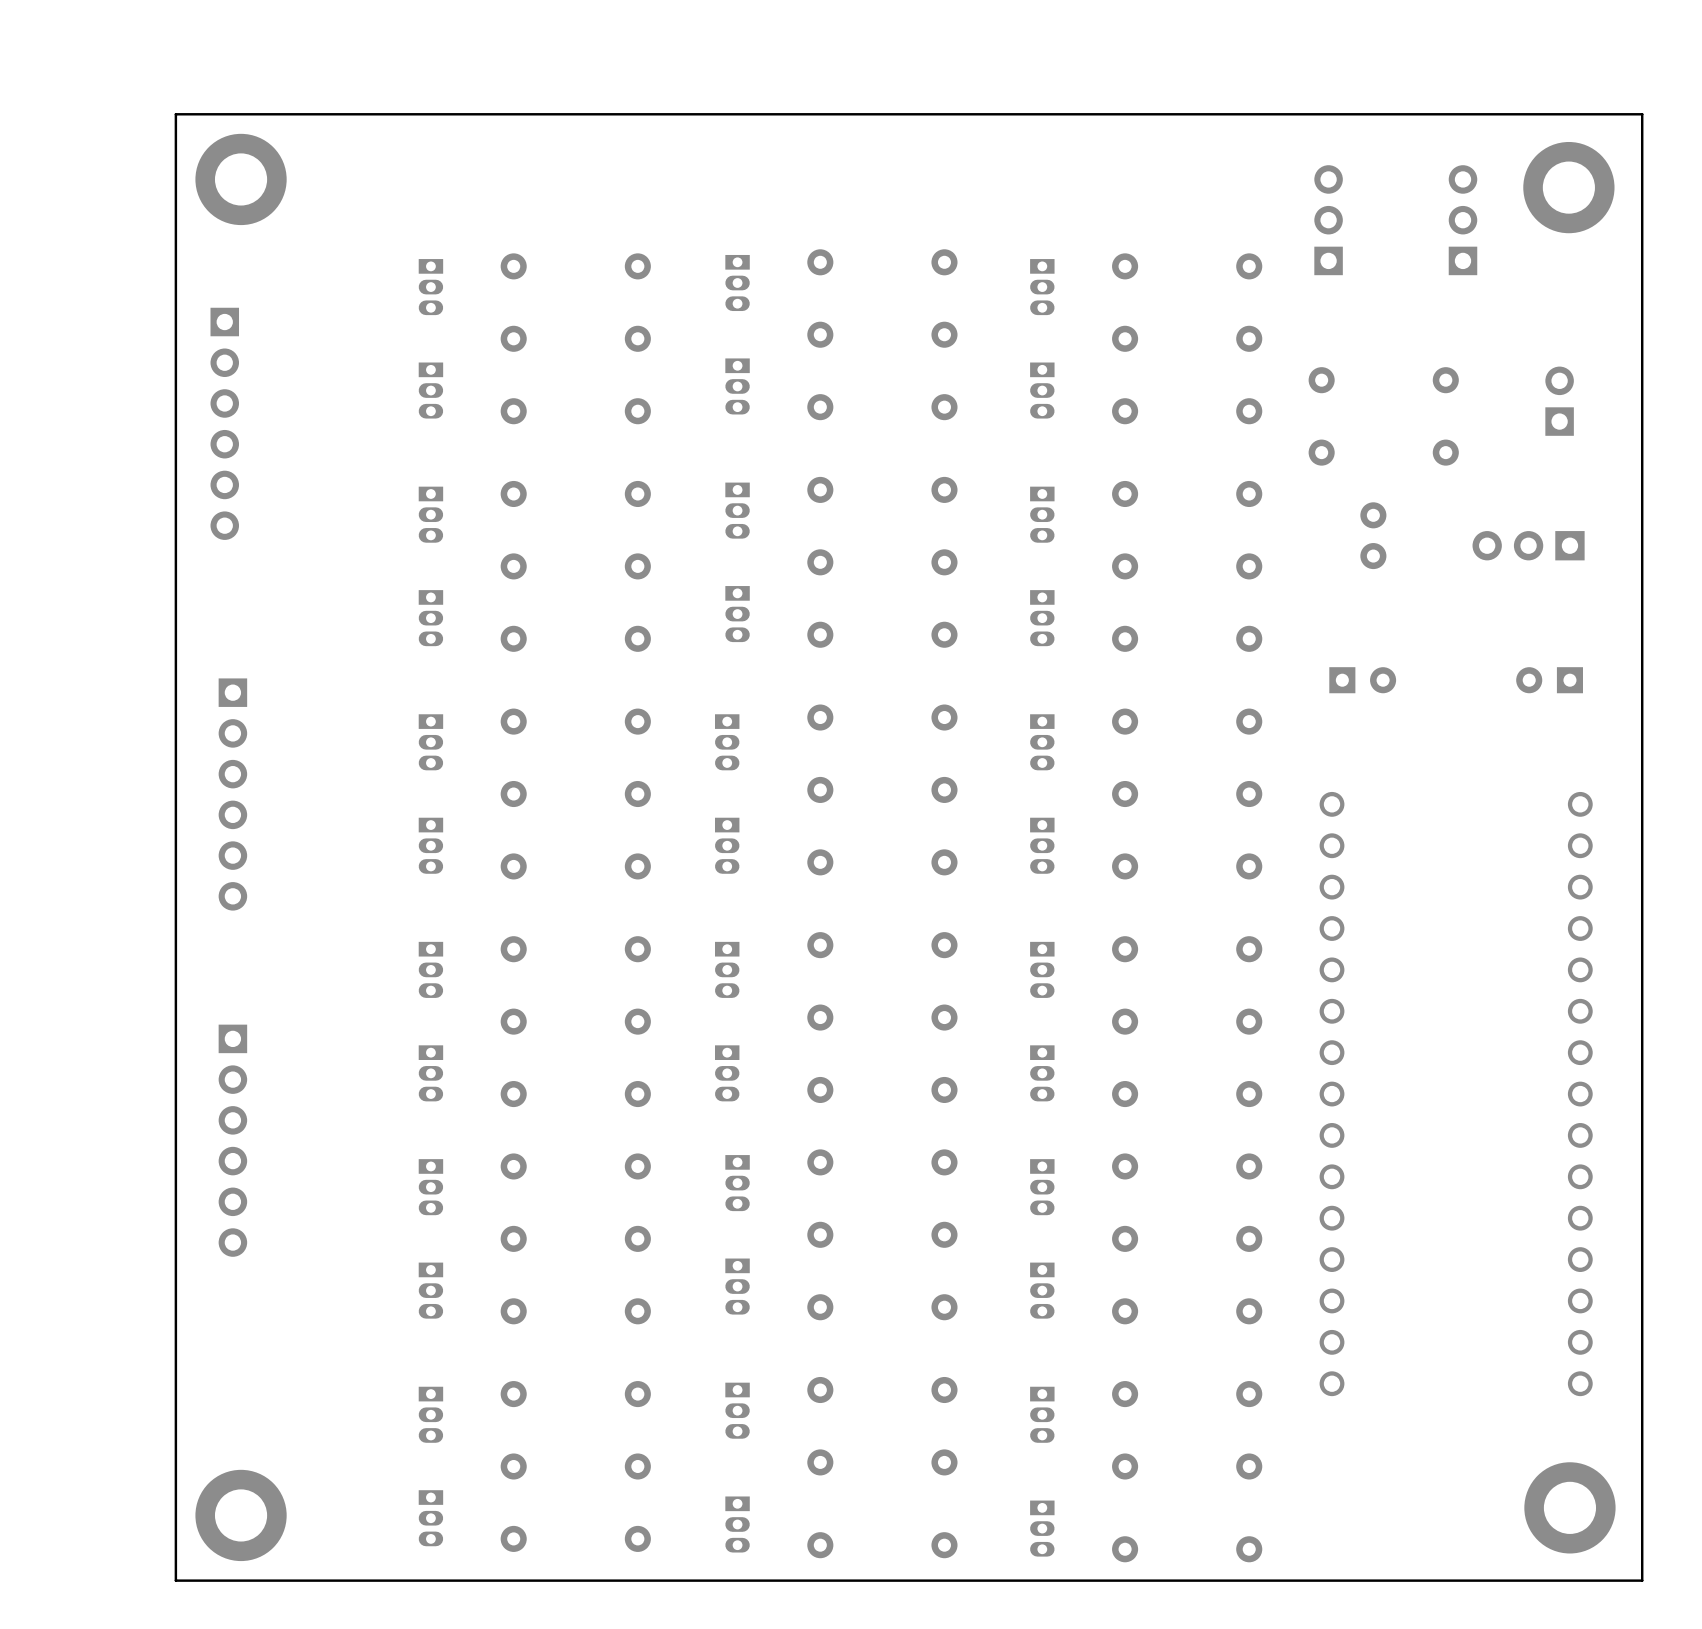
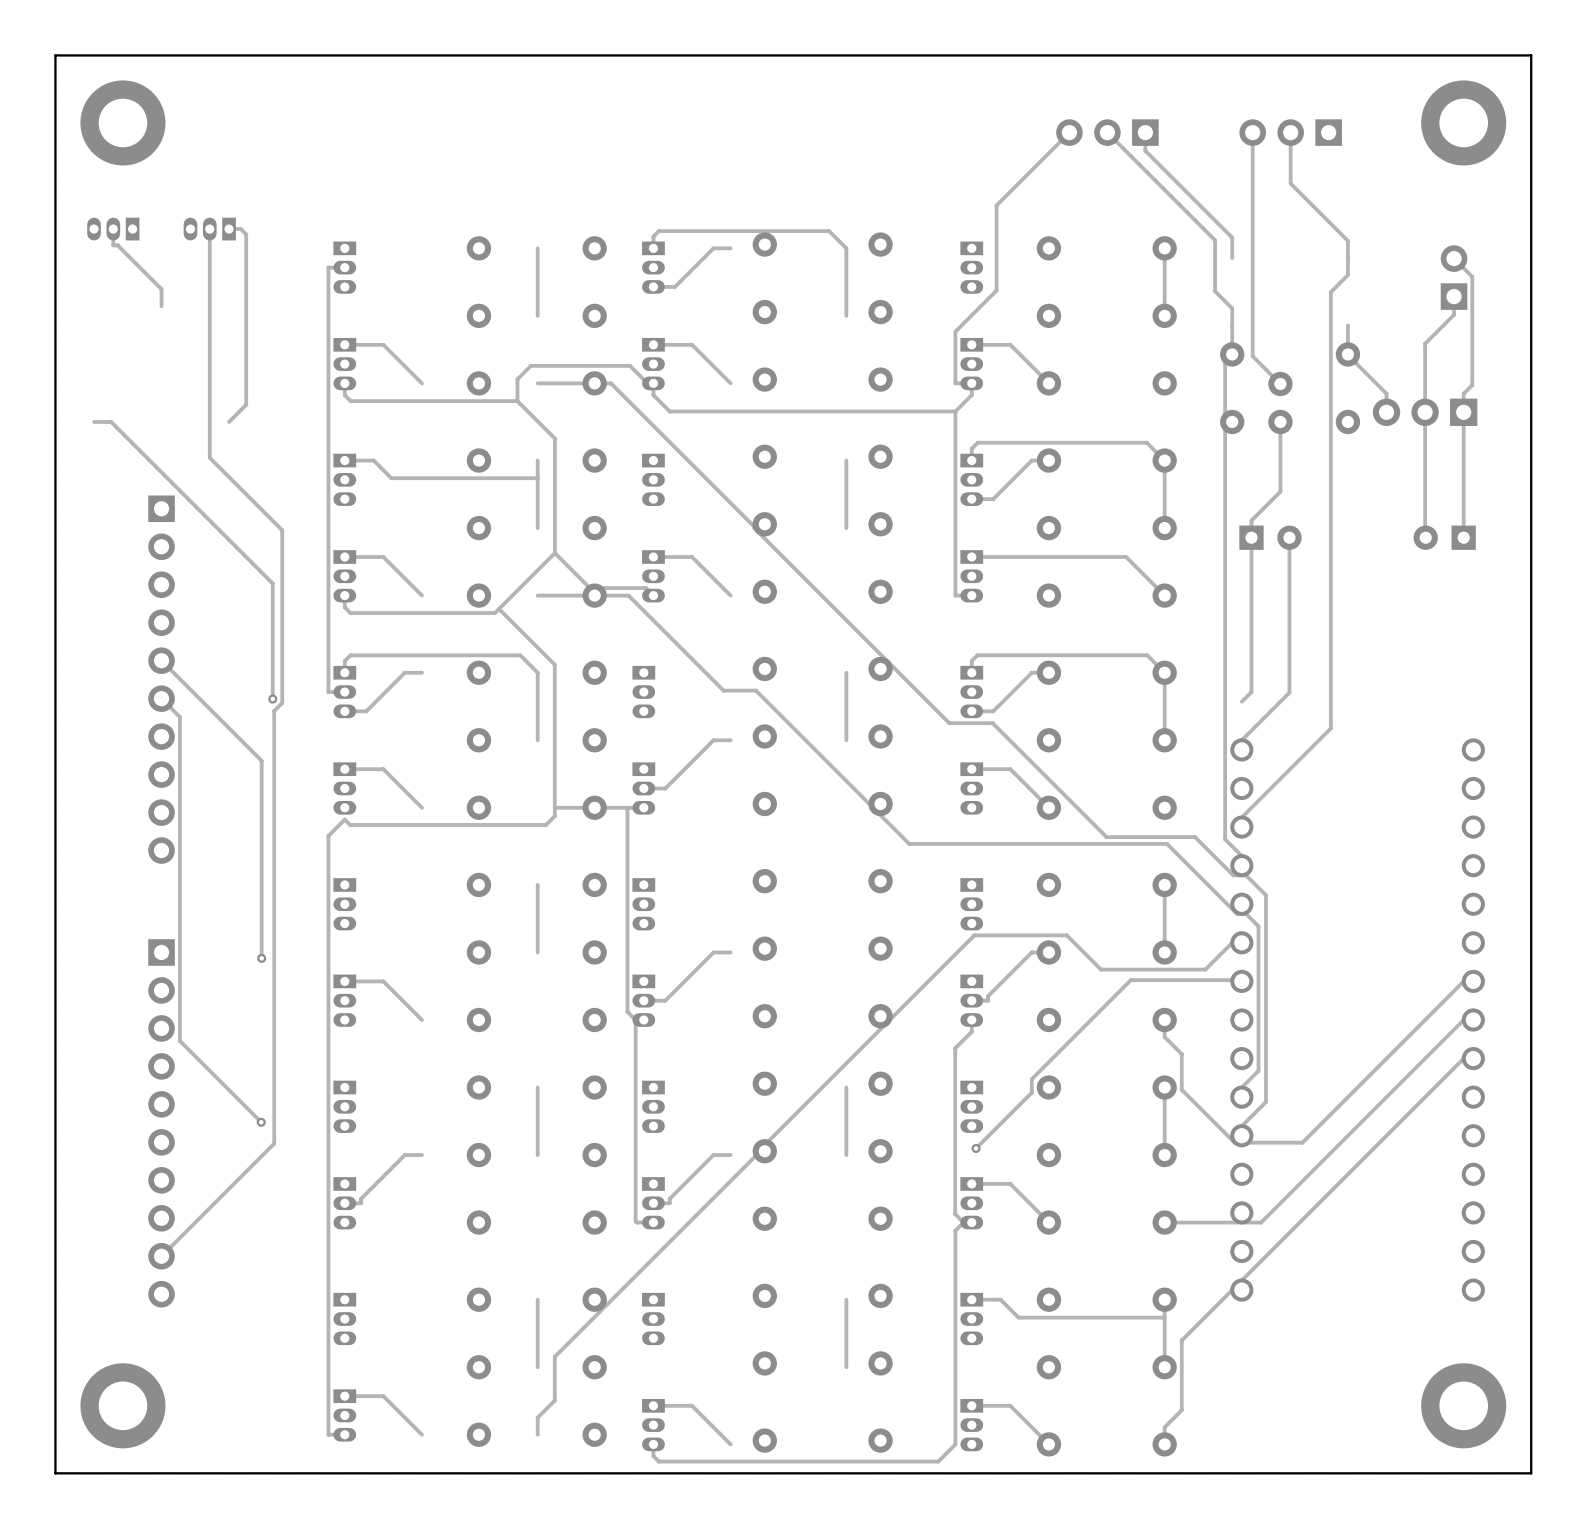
board edge: (1642, 114) (1642, 1580) (175, 1580) (175, 114) (1642, 114) -> (1531, 55) (1531, 1473) (55, 1473) (55, 55) (1531, 55)
track: none -> (1069, 132) (996, 205) (996, 290) (955, 331) (955, 383) (971, 383) (971, 395) (955, 411)
track: none -> (1107, 132) (1215, 240) (1215, 291) (1232, 308) (1232, 342) (1225, 349) (1225, 839) (1241, 856)
part: none -> (1107, 132)
track: none -> (1145, 132) (1145, 150) (1232, 237) (1232, 257)
track: none -> (1252, 132) (1252, 356) (1280, 383)
track: none -> (1290, 132) (1290, 183) (1347, 240) (1347, 275) (1330, 292) (1330, 728) (1241, 817)
part: none -> (1290, 132)
part position: (241, 179) -> (122, 122)
part position: (1568, 187) -> (1463, 122)
part: (1328, 220) -> none
part: (1462, 220) -> none
track: none -> (113, 229) (113, 245) (117, 245) (161, 289) (161, 306)
part: none -> (113, 229)
track: none -> (209, 229) (209, 457) (282, 530) (282, 702) (274, 711) (274, 1143) (161, 1256)
part: none -> (209, 229)
track: none -> (229, 229) (240, 229) (246, 234) (246, 404) (229, 421)
track: none -> (537, 248) (537, 315)
track: none -> (653, 248) (653, 236) (658, 231) (829, 231) (846, 248) (846, 315)
track: none -> (730, 248) (713, 248) (674, 286) (653, 286)
track: none -> (1164, 248) (1164, 315)
track: none -> (1454, 258) (1472, 276) (1472, 385) (1463, 393) (1463, 537)
part position: (737, 283) -> (653, 267)
track: none -> (344, 267) (328, 267) (328, 692) (344, 692)
part: none -> (344, 267)
part: (430, 287) -> none
track: none -> (1454, 296) (1454, 314) (1425, 343) (1425, 537)
track: none -> (1347, 325) (1347, 355) (1386, 393) (1386, 412)
track: none -> (344, 344) (383, 344) (421, 383)
track: none -> (653, 344) (692, 344) (730, 383)
track: none -> (971, 344) (1010, 344) (1048, 383)
part position: (737, 386) -> (653, 364)
part: none -> (344, 364)
part: (430, 390) -> none
part position: (1559, 401) -> (1454, 277)
track: none -> (344, 383) (344, 395) (350, 401) (517, 401)
track: none -> (537, 383) (610, 383) (949, 723) (992, 723) (1106, 837) (1195, 837) (1233, 875) (1245, 875) (1266, 895) (1266, 1101) (1241, 1126)
track: none -> (653, 383) (653, 395) (669, 411) (955, 411)
track: none -> (653, 389) (630, 365) (530, 365) (517, 379) (517, 401)
part: (224, 423) -> none
track: none -> (517, 401) (554, 438) (554, 553)
track: none -> (955, 411) (955, 595) (971, 595)
track: none -> (94, 421) (111, 421) (272, 583) (272, 699)
track: none -> (1280, 421) (1280, 491) (1251, 520) (1251, 692) (1241, 701)
track: none -> (344, 460) (373, 460) (391, 478) (537, 478)
track: none -> (537, 460) (537, 528)
track: none -> (846, 460) (846, 528)
track: none -> (971, 460) (971, 448) (977, 442) (1146, 442) (1164, 460) (1164, 528)
track: none -> (1048, 460) (1031, 460) (993, 499) (971, 499)
part position: (737, 510) -> (653, 479)
part: none -> (344, 479)
part: (430, 514) -> none
part position: (1373, 535) -> (1280, 402)
part position: (1528, 545) -> (1425, 412)
track: none -> (1289, 537) (1289, 692) (1241, 740)
track: none -> (554, 553) (494, 613) (350, 613) (344, 607) (344, 595)
track: none -> (554, 553) (589, 588) (645, 588) (653, 595)
track: none -> (344, 557) (383, 557) (421, 595)
track: none -> (653, 557) (692, 557) (730, 595)
track: none -> (971, 557) (1126, 557) (1164, 595)
part position: (737, 614) -> (653, 576)
part: none -> (344, 576)
part: (430, 618) -> none
track: none -> (537, 595) (628, 595) (723, 690) (755, 690) (909, 843) (1167, 843) (1236, 913) (1246, 913) (1258, 926) (1258, 1070) (1241, 1087)
track: none -> (499, 608) (554, 664) (554, 816) (546, 824) (350, 824) (344, 819) (328, 835) (328, 1434) (344, 1434)
part position: (1362, 680) -> (1270, 537)
part position: (1549, 680) -> (1444, 537)
track: none -> (161, 660) (261, 760) (261, 958)
track: none -> (344, 672) (344, 660) (350, 655) (520, 655) (537, 672) (537, 740)
track: none -> (421, 672) (404, 672) (366, 711) (344, 711)
track: none -> (846, 672) (846, 740)
track: none -> (971, 672) (971, 660) (977, 655) (1147, 655) (1164, 672) (1164, 740)
track: none -> (1048, 672) (1031, 672) (993, 711) (971, 711)
part: none -> (161, 679)
part: none -> (344, 692)
part: (430, 742) -> none
part position: (727, 742) -> (643, 692)
track: none -> (161, 698) (179, 717) (179, 1040) (261, 1122)
via: none -> (272, 699)
part: (232, 794) -> none
track: none -> (730, 740) (713, 740) (665, 788) (643, 788)
track: none -> (344, 769) (383, 769) (421, 807)
track: none -> (971, 769) (1010, 769) (1048, 807)
part: none -> (344, 788)
part: (430, 845) -> none
part position: (727, 845) -> (643, 788)
track: none -> (627, 807) (627, 1011) (635, 1019)
track: none -> (643, 807) (554, 807)
track: none -> (537, 884) (537, 952)
track: none -> (1164, 884) (1164, 952)
part: none -> (344, 904)
part: (430, 969) -> none
part position: (727, 969) -> (643, 904)
track: none -> (1241, 933) (1205, 969) (1101, 969) (1066, 935) (974, 935) (554, 1356) (554, 1400) (537, 1417) (537, 1434)
track: none -> (730, 952) (713, 952) (665, 1000) (643, 1000)
track: none -> (1048, 952) (1031, 952) (988, 996) (988, 1000) (971, 1000)
via: none -> (261, 958)
track: none -> (1241, 971) (1233, 980) (1130, 980) (1031, 1079) (1031, 1092) (976, 1148)
track: none -> (1473, 971) (1302, 1142) (1234, 1142) (1181, 1089) (1181, 1054) (1164, 1037) (1164, 1019)
track: none -> (344, 981) (383, 981) (421, 1019)
part: none -> (344, 1000)
part: (430, 1073) -> none
part position: (727, 1073) -> (643, 1000)
track: none -> (1473, 1010) (1261, 1222) (1164, 1222)
track: none -> (635, 1019) (635, 1221) (653, 1222)
track: none -> (971, 1019) (971, 1031) (955, 1048) (955, 1214) (963, 1222)
track: none -> (1473, 1048) (1181, 1340) (1181, 1410) (1164, 1427) (1164, 1444)
part: (232, 1140) -> none
track: none -> (537, 1087) (537, 1155)
track: none -> (846, 1087) (846, 1155)
track: none -> (1164, 1087) (1164, 1155)
part position: (737, 1183) -> (653, 1106)
part: none -> (344, 1106)
part: (430, 1187) -> none
via: none -> (261, 1122)
part: none -> (161, 1123)
via: none -> (976, 1148)
track: none -> (421, 1155) (404, 1155) (361, 1198) (361, 1203) (344, 1203)
track: none -> (730, 1155) (713, 1155) (669, 1198) (669, 1203) (653, 1203)
track: none -> (971, 1183) (1010, 1183) (1048, 1222)
part position: (737, 1286) -> (653, 1203)
part: none -> (344, 1203)
part: (430, 1290) -> none
track: none -> (963, 1222) (955, 1230) (955, 1444) (938, 1461) (658, 1461) (653, 1456) (653, 1444)
track: none -> (537, 1299) (537, 1367)
track: none -> (846, 1299) (846, 1367)
track: none -> (971, 1299) (1000, 1299) (1018, 1317) (1164, 1317)
track: none -> (1164, 1299) (1164, 1367)
part position: (737, 1410) -> (653, 1319)
part: none -> (344, 1319)
part: (430, 1414) -> none
track: none -> (344, 1396) (383, 1396) (421, 1434)
track: none -> (653, 1405) (692, 1405) (730, 1444)
track: none -> (971, 1405) (1010, 1405) (1048, 1444)
part position: (241, 1515) -> (122, 1405)
part: none -> (344, 1415)
part: (430, 1518) -> none
part position: (737, 1524) -> (653, 1425)

